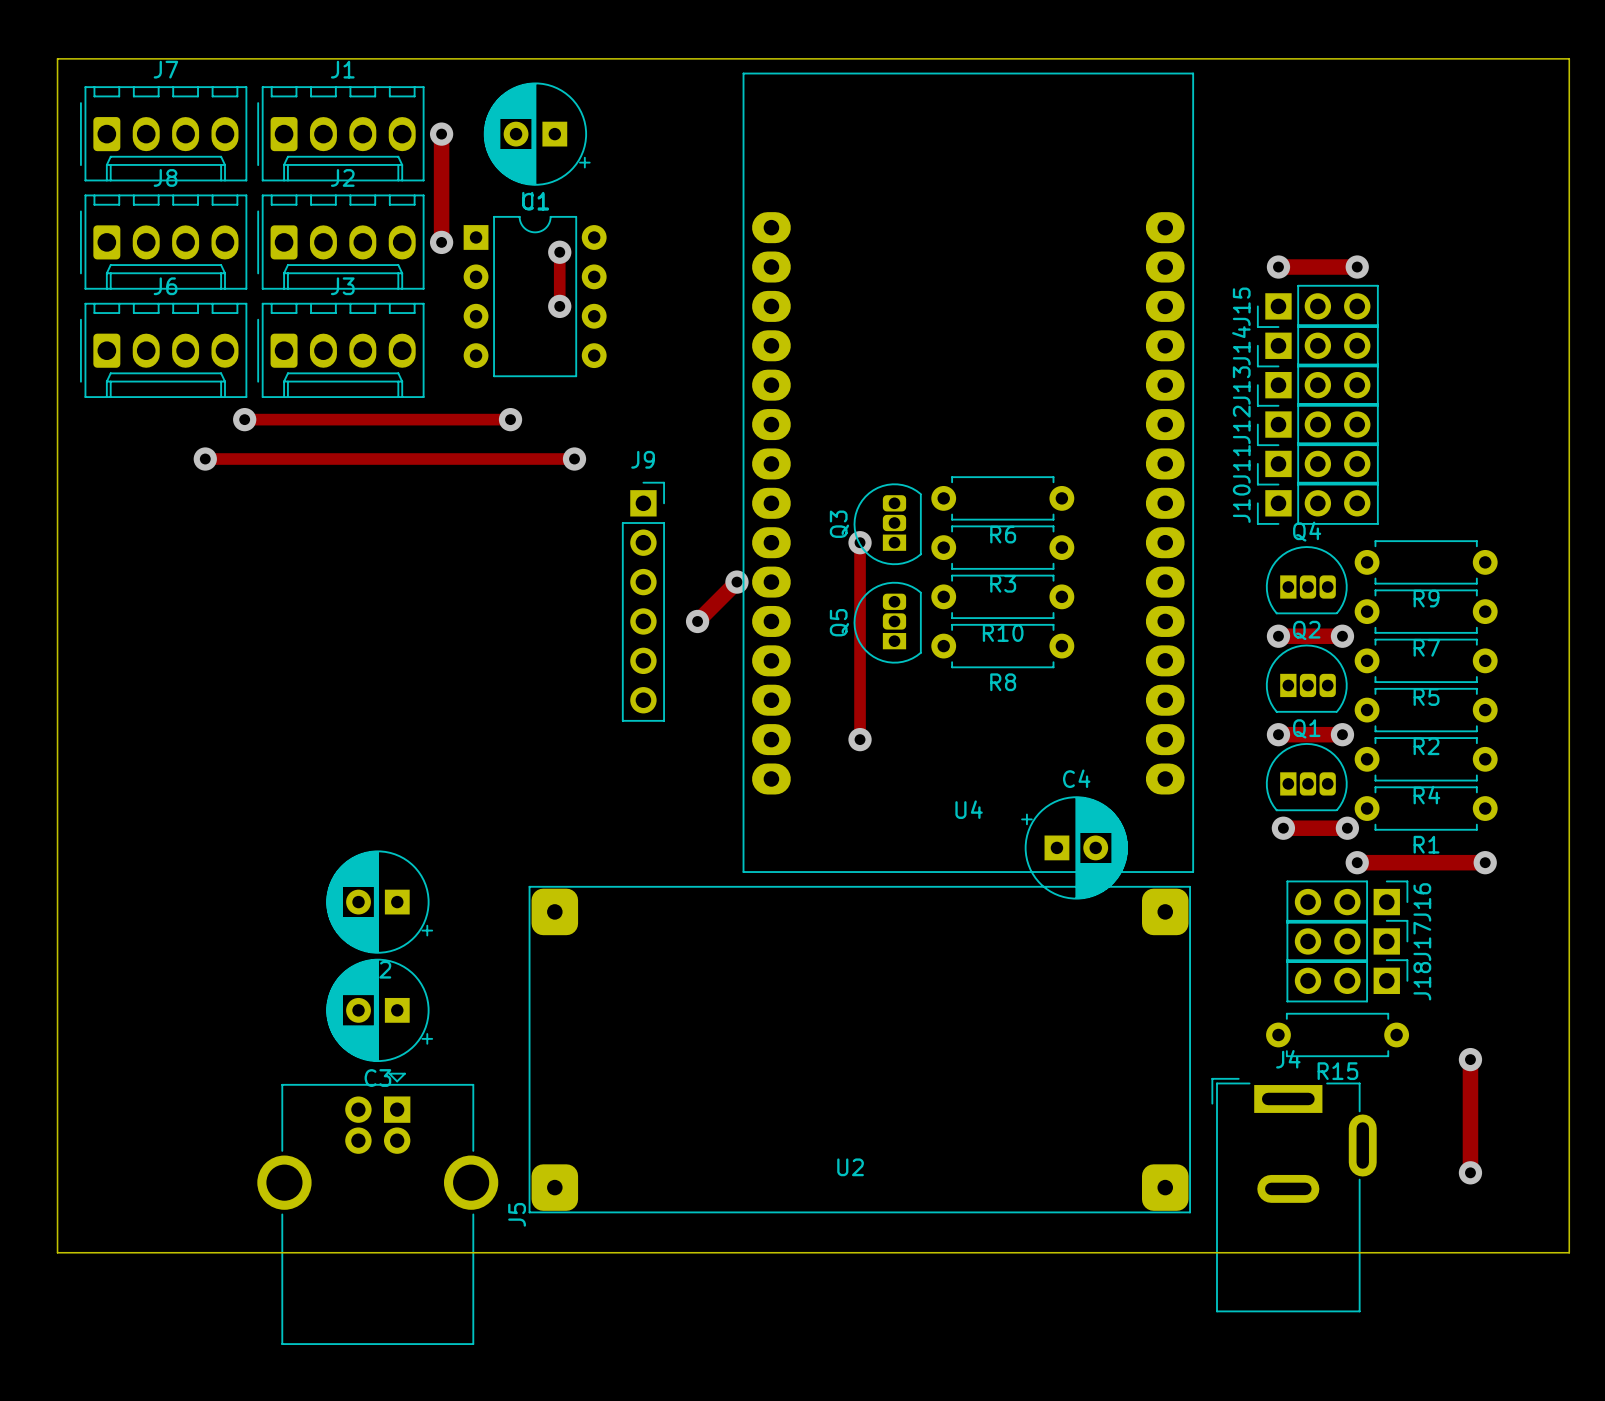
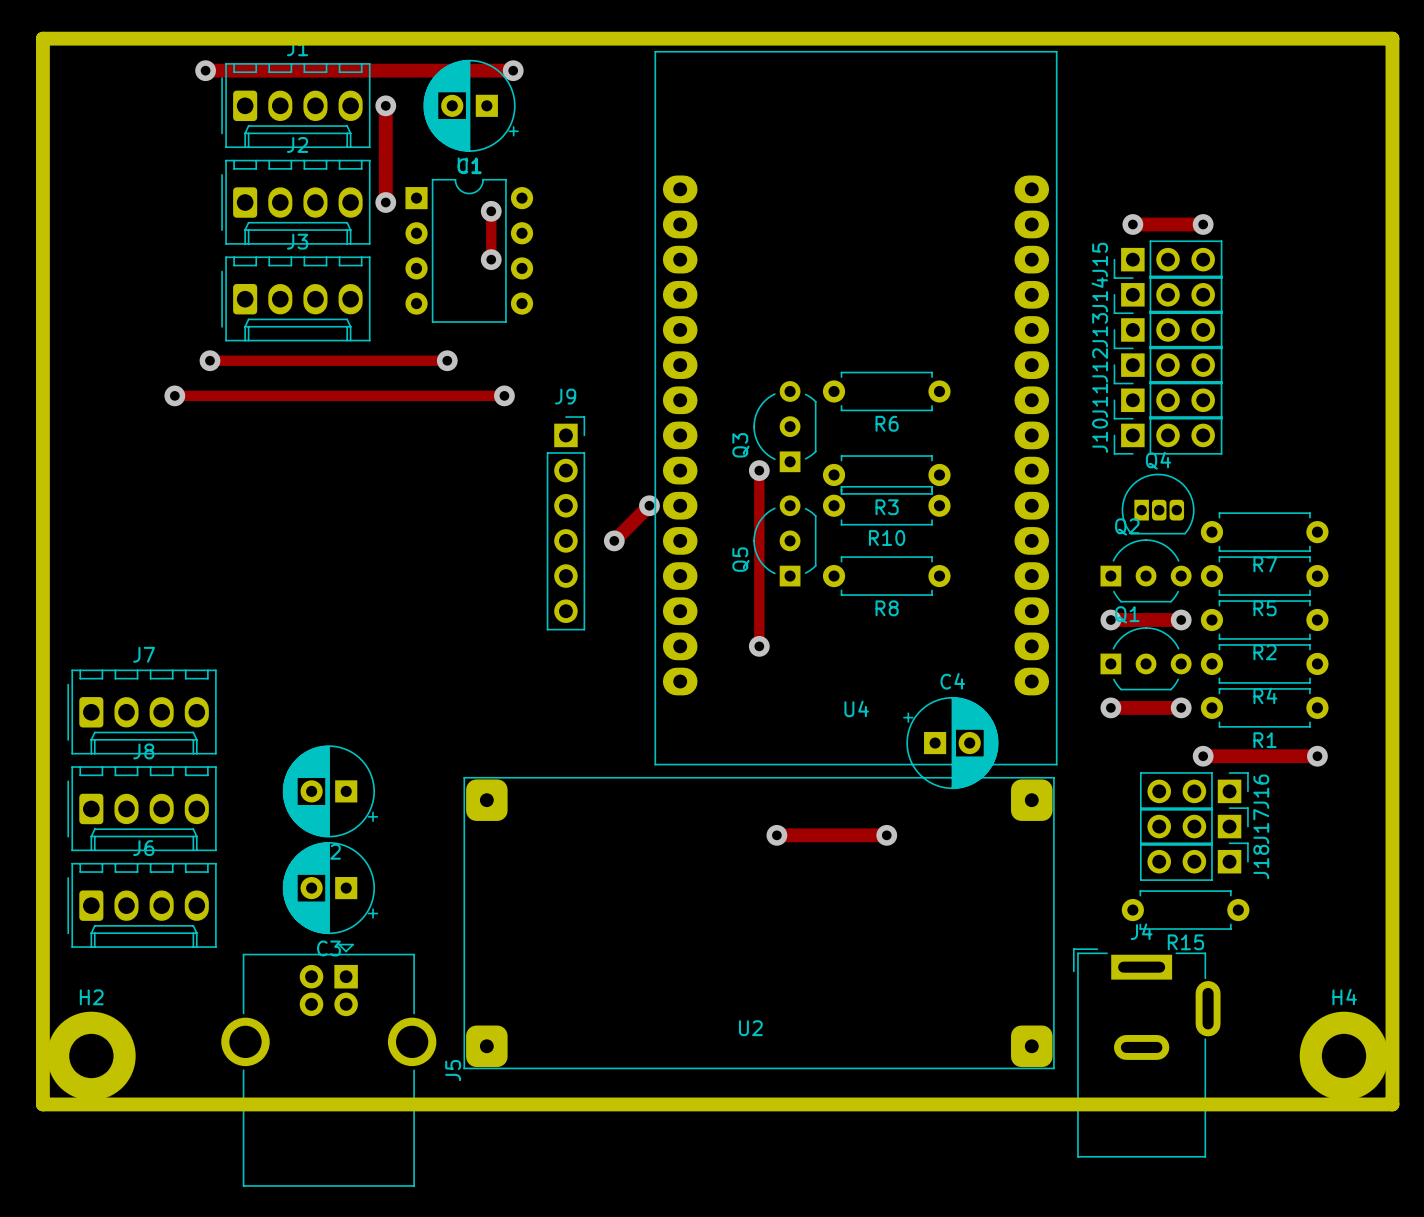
board edge width: thin (57, 58) (57, 1252) (1569, 1252) (1569, 58) (57, 58) -> thick (42, 38) (42, 1104) (1392, 1104) (1392, 38) (42, 38)
J7 footprint: [80, 86, 248, 182] -> [67, 669, 217, 755]
track: none -> (205, 70) (513, 70)
via: none -> (205, 70)
via: none -> (513, 70)
J8 position: (163, 242) -> (142, 808)
J6 footprint: [80, 302, 248, 399] -> [67, 862, 217, 948]
Q3 footprint: [853, 483, 922, 566] -> [753, 381, 817, 473]
R6 position: (1002, 498) -> (886, 391)
R9: (1426, 562) -> none
Q5 footprint: [853, 581, 922, 664] -> [753, 495, 817, 587]
R10 position: (1002, 596) -> (886, 505)
track: (1278, 636) (1342, 636) -> none
via: (1278, 636) -> none
via: (1342, 636) -> none
Q2 footprint: [1265, 644, 1348, 713] -> [1100, 539, 1192, 603]
R8 position: (1002, 646) -> (886, 576)
track: none -> (1110, 620) (1181, 620)
via: none -> (1110, 620)
track: (1278, 734) (1342, 734) -> none
via: (1278, 734) -> none
via position: (1342, 734) -> (1181, 620)
Q1 footprint: [1265, 742, 1348, 812] -> [1100, 627, 1192, 691]
track: none -> (1110, 707) (1181, 707)
via: none -> (1110, 707)
track: (1283, 828) (1347, 828) -> none
via: (1283, 828) -> none
via position: (1347, 828) -> (1181, 707)
track: none -> (776, 835) (886, 835)
via: none -> (776, 835)
via: none -> (886, 835)
track: (1470, 1059) (1470, 1172) -> none
via: (1470, 1059) -> none
via: (1470, 1172) -> none
H2: none -> (91, 1056)
H4: none -> (1344, 1056)

